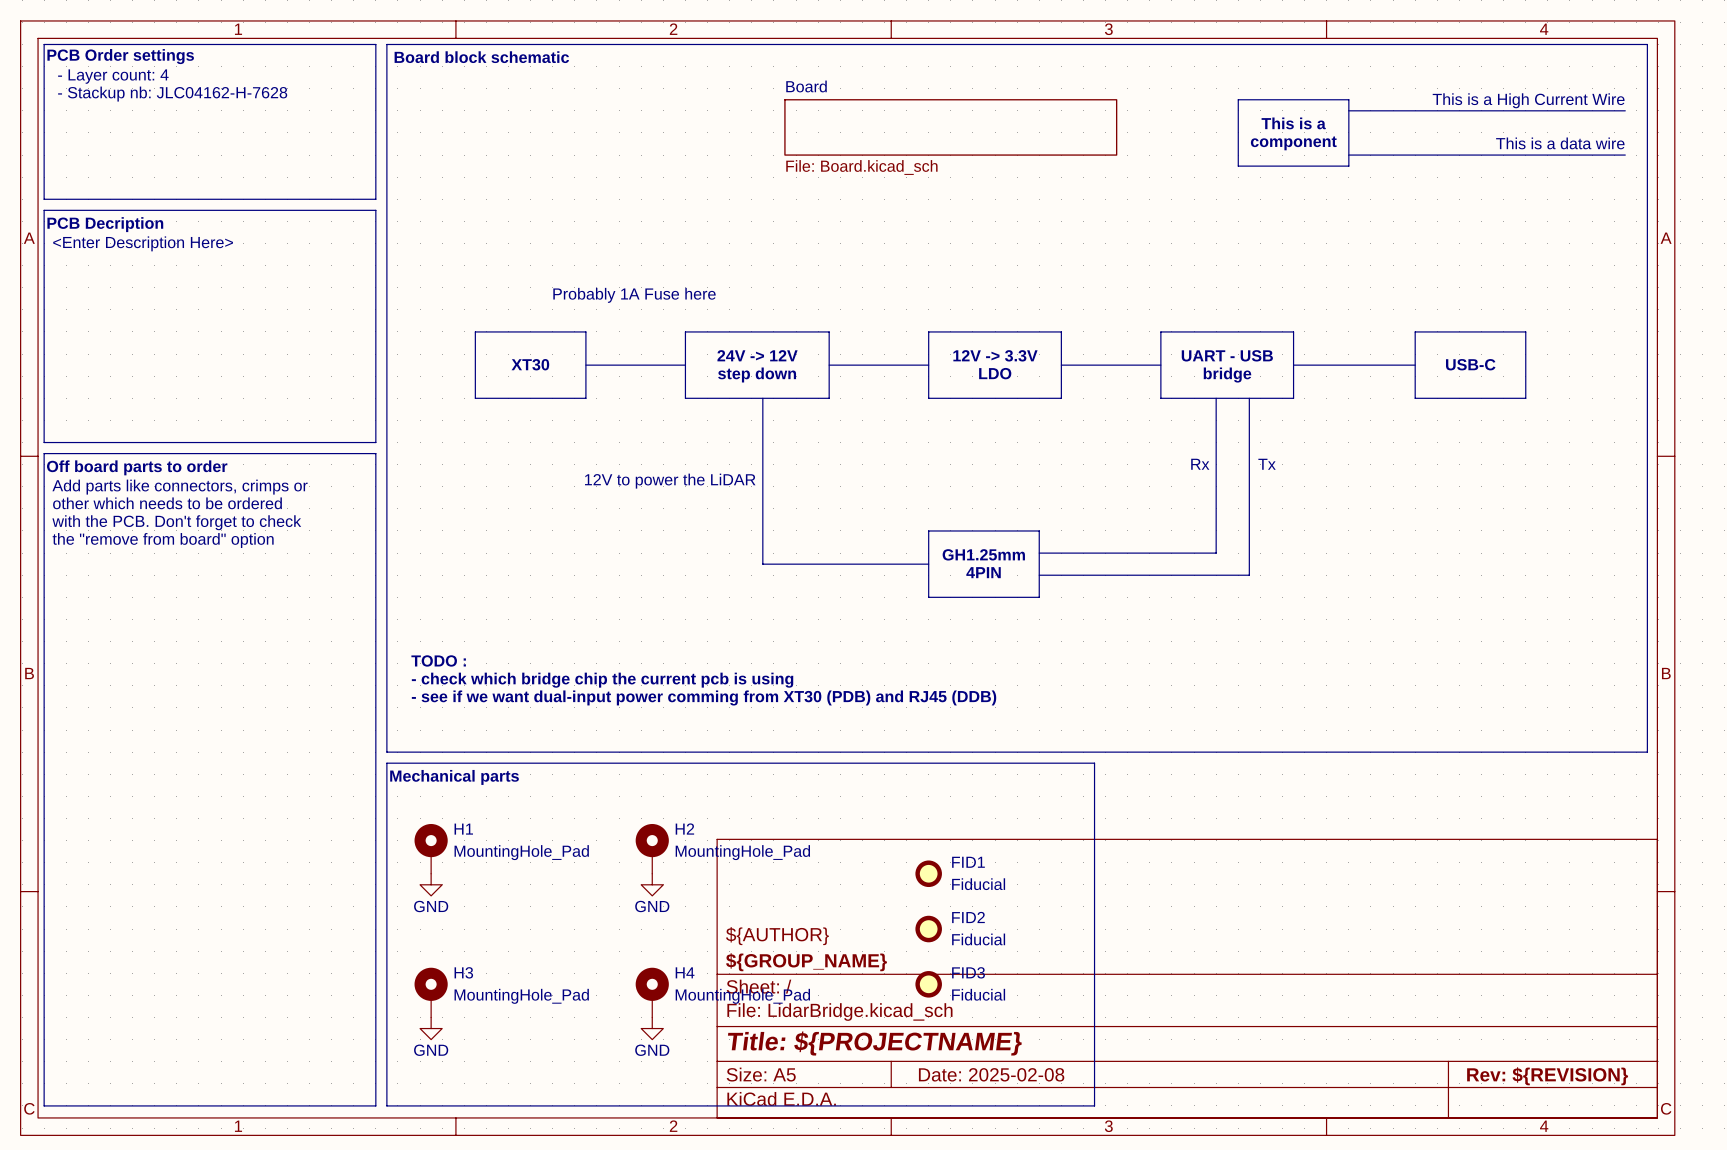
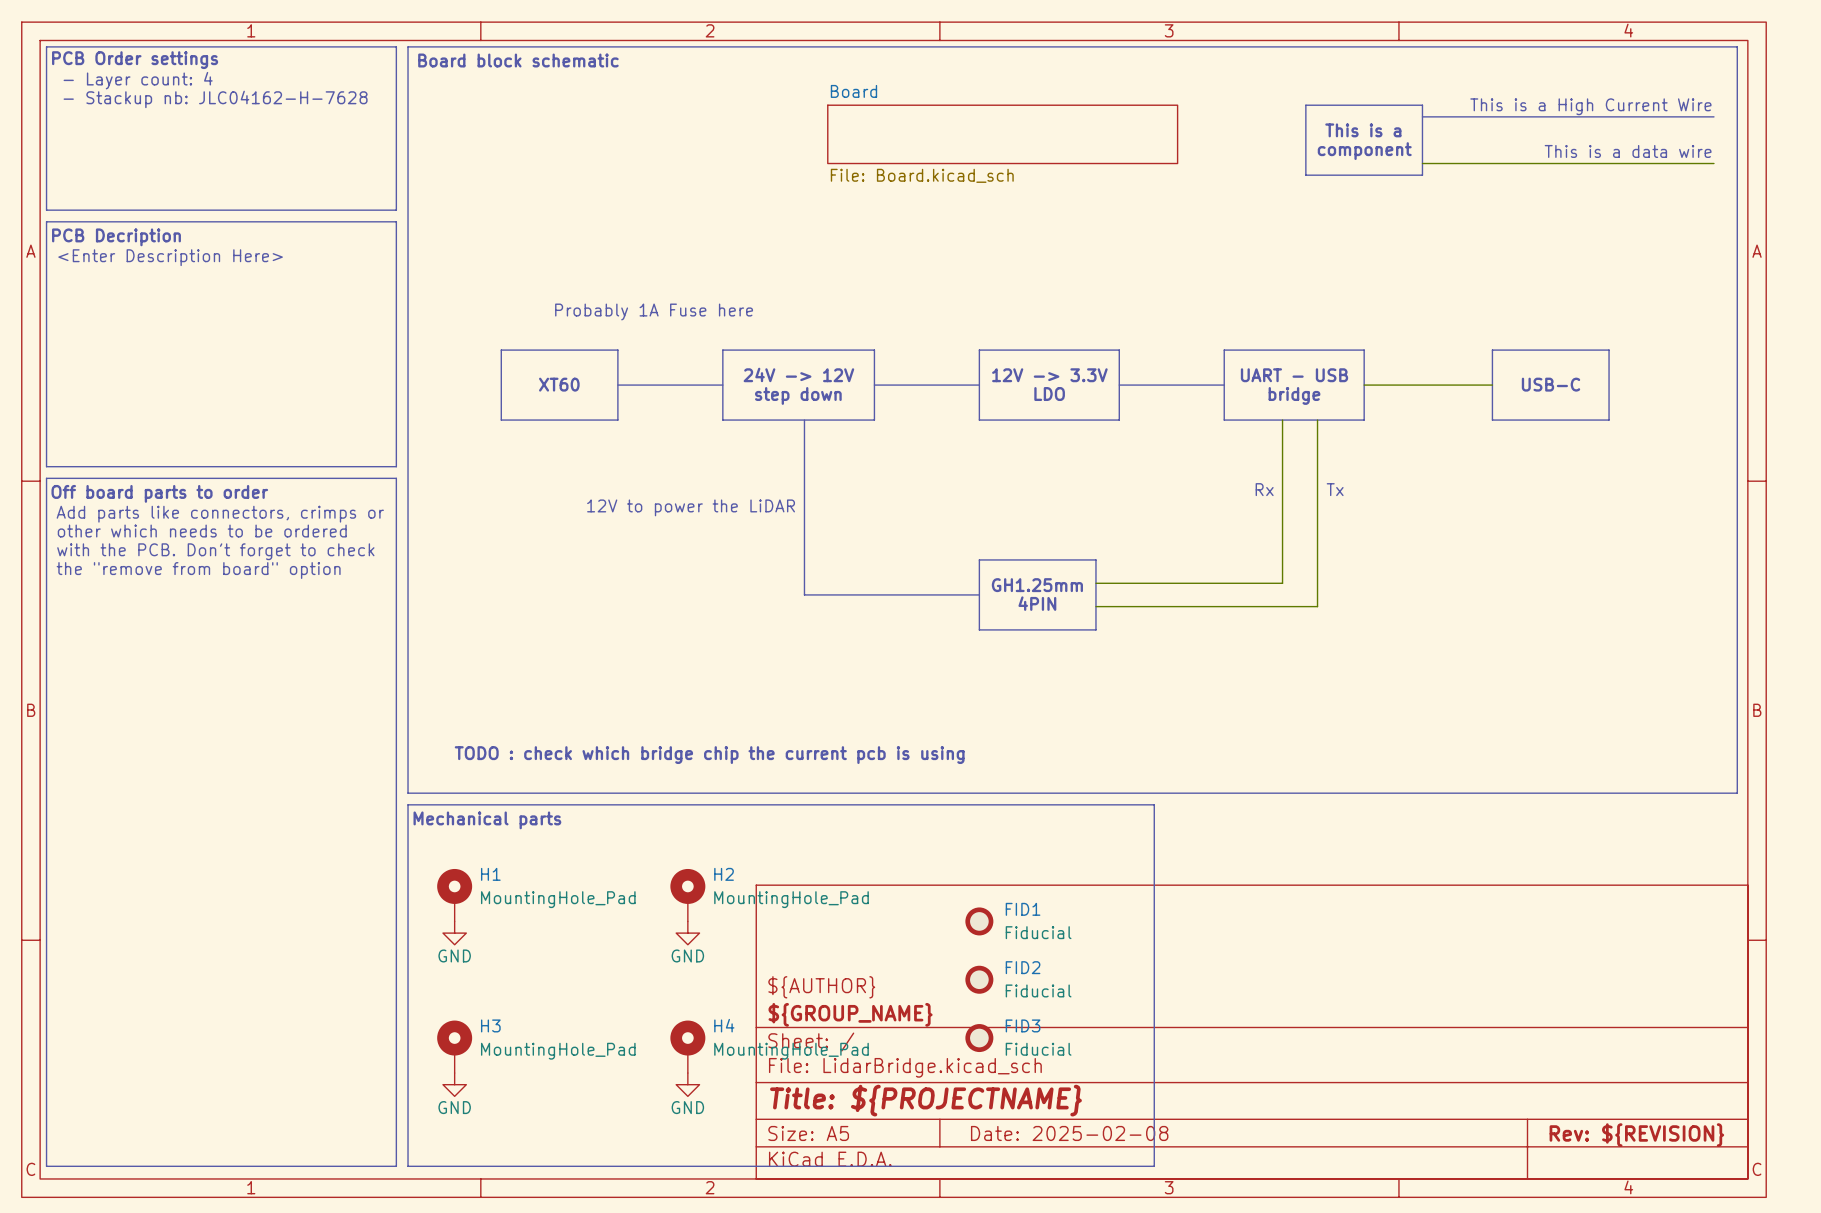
text: XT30 (530, 364) -> XT60 (559, 384)
text: TODO : (438, 660) -> none
text: - check which bridge chip the current pcb is using (602, 680) -> none
text: - see if we want dual-input power comming from XT30 (PDB) and RJ45 (DDB) (704, 697) -> none
text: none -> TODO : check which bridge chip the current pcb is using (709, 755)

